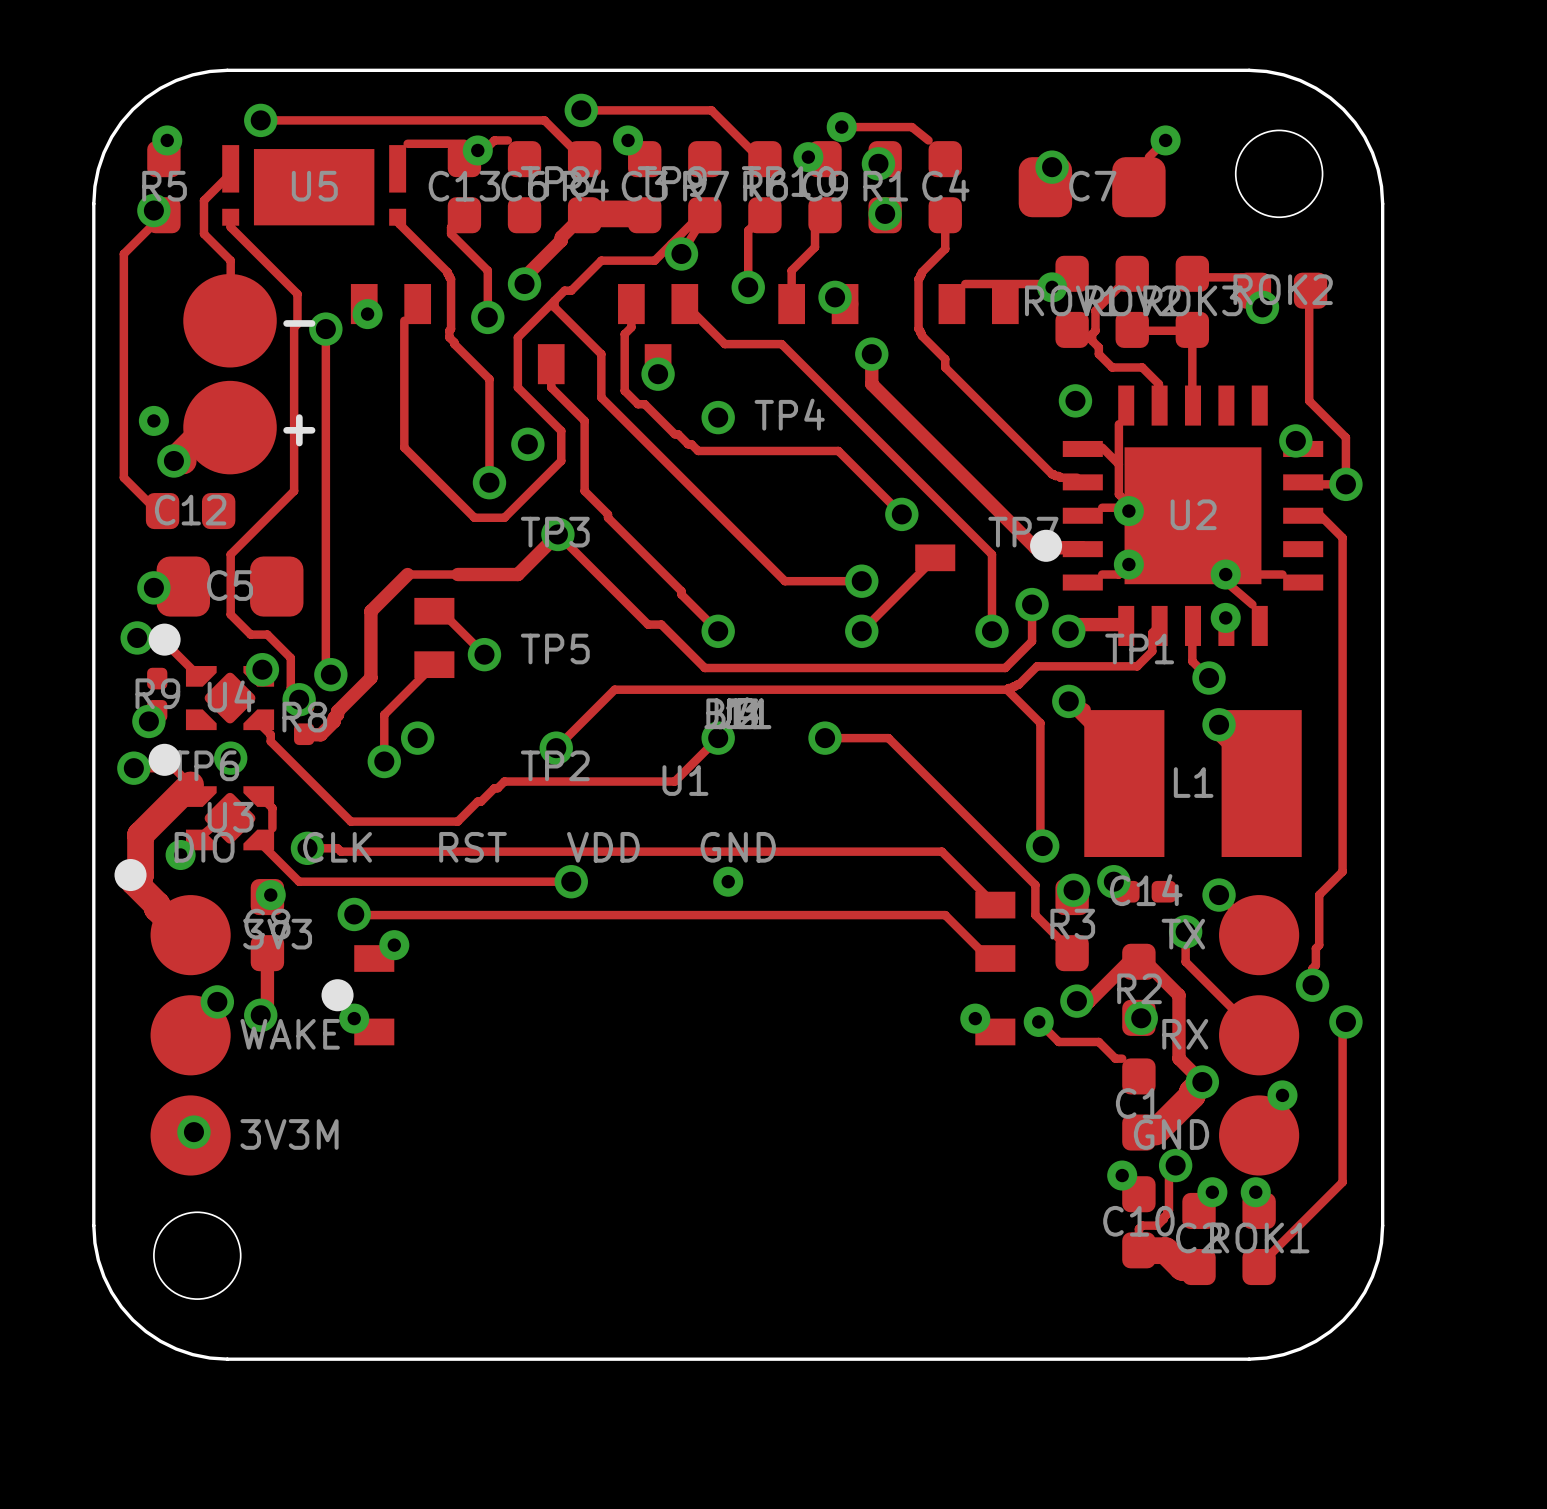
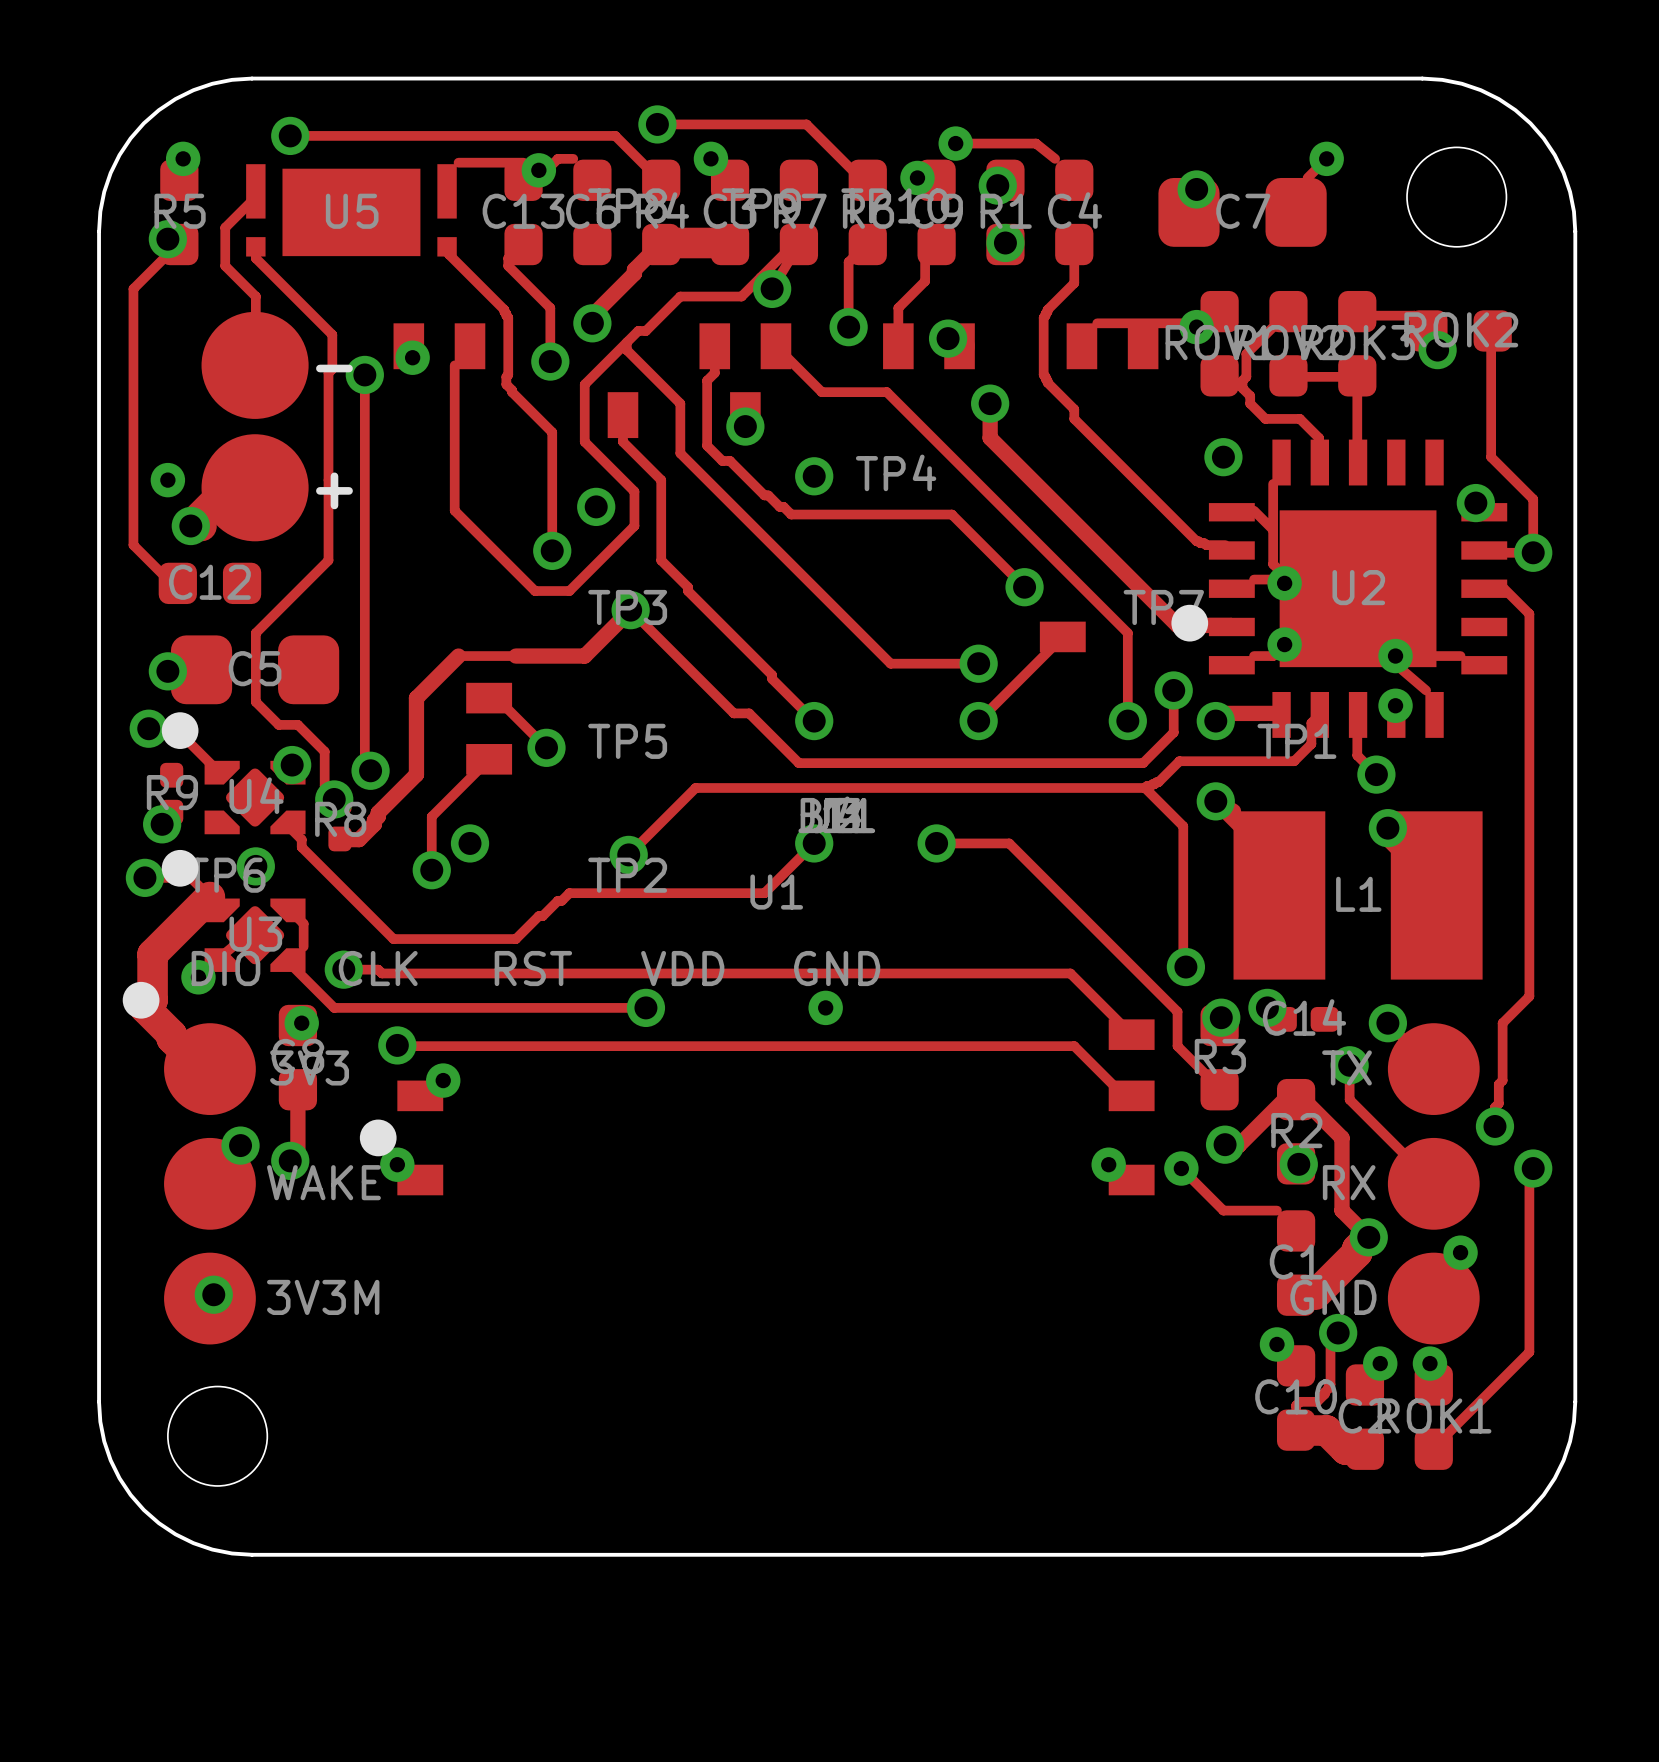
track: (1058, 1041) (1098, 1041) (1115, 1058) -> (1204, 1191) (1223, 1210) (1269, 1210)

